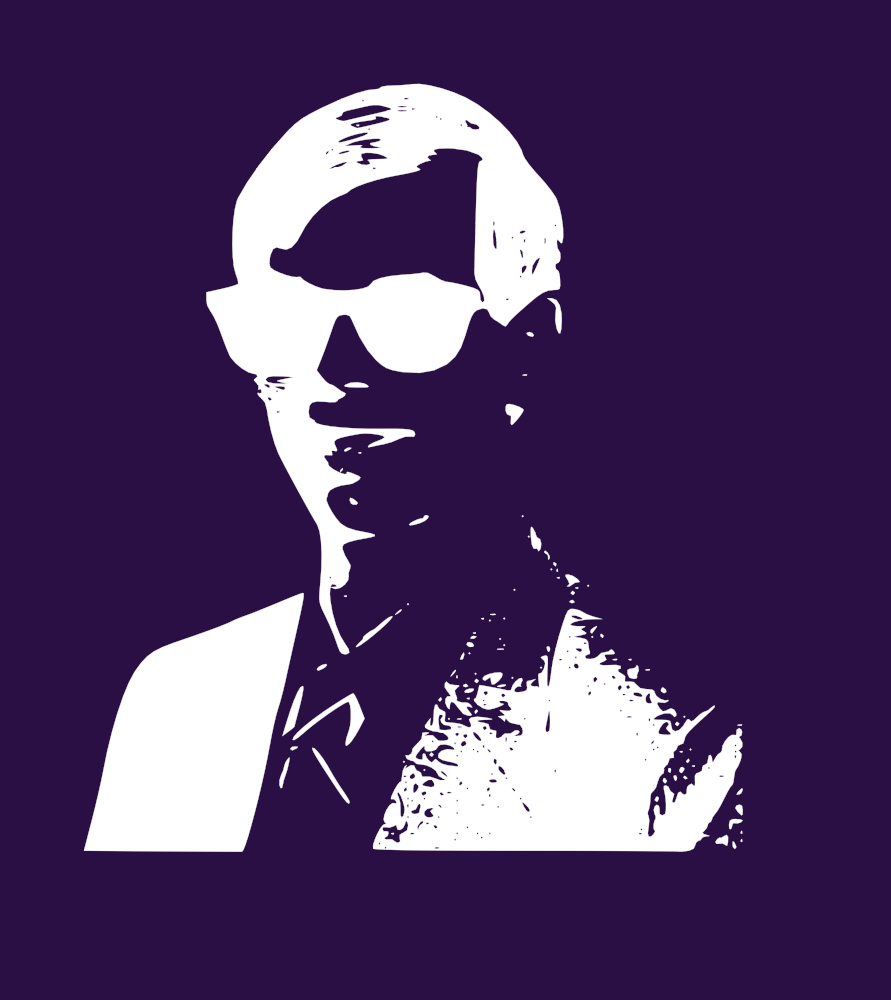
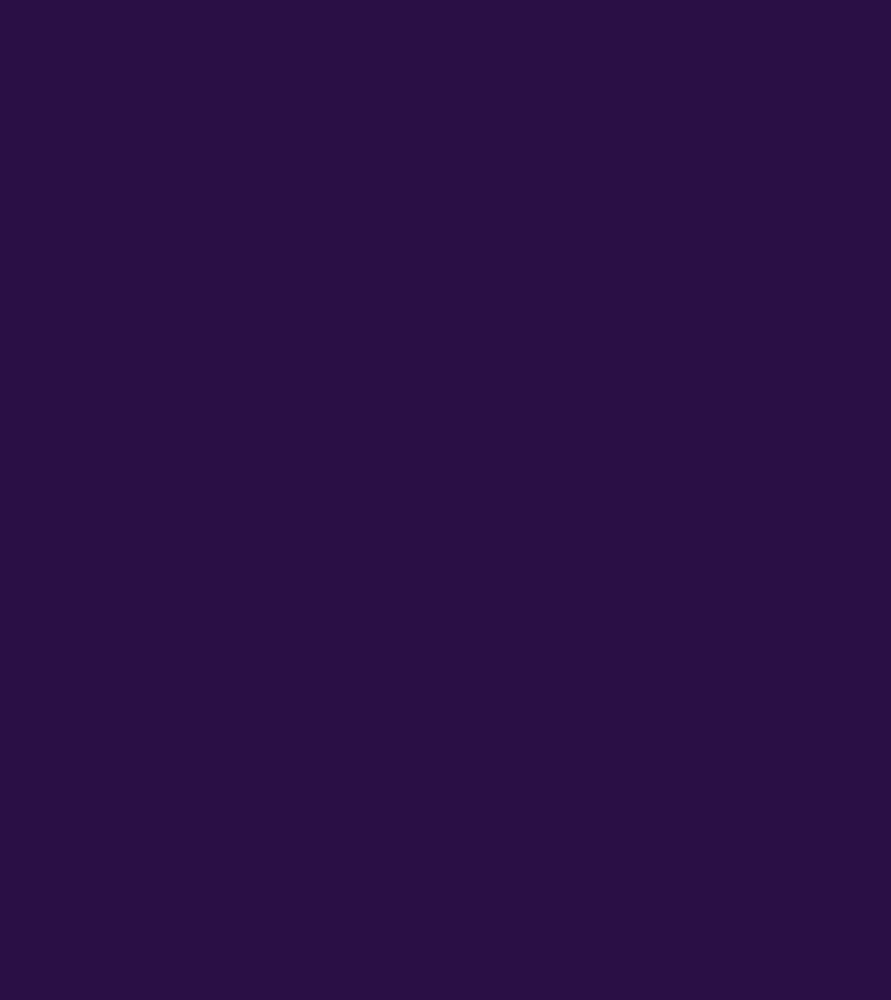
drawing: [83, 83, 743, 852] -> none

